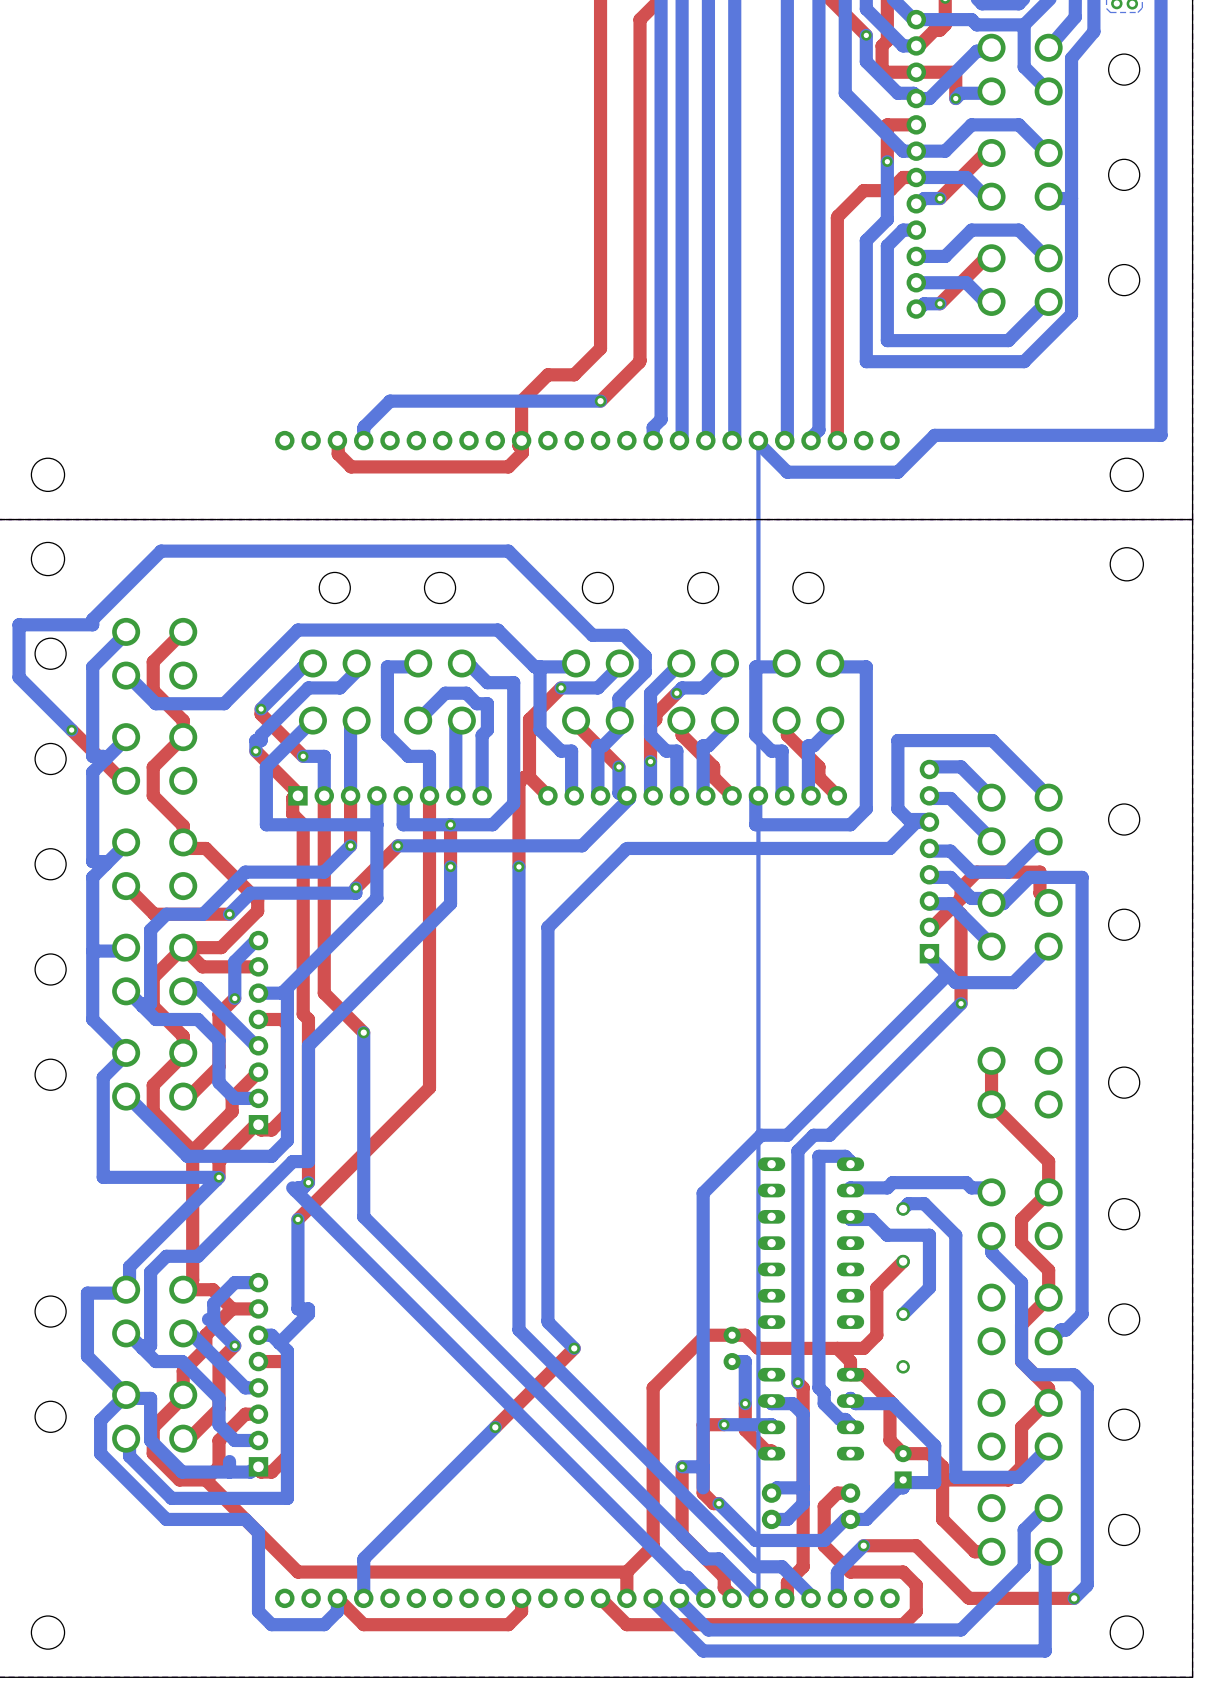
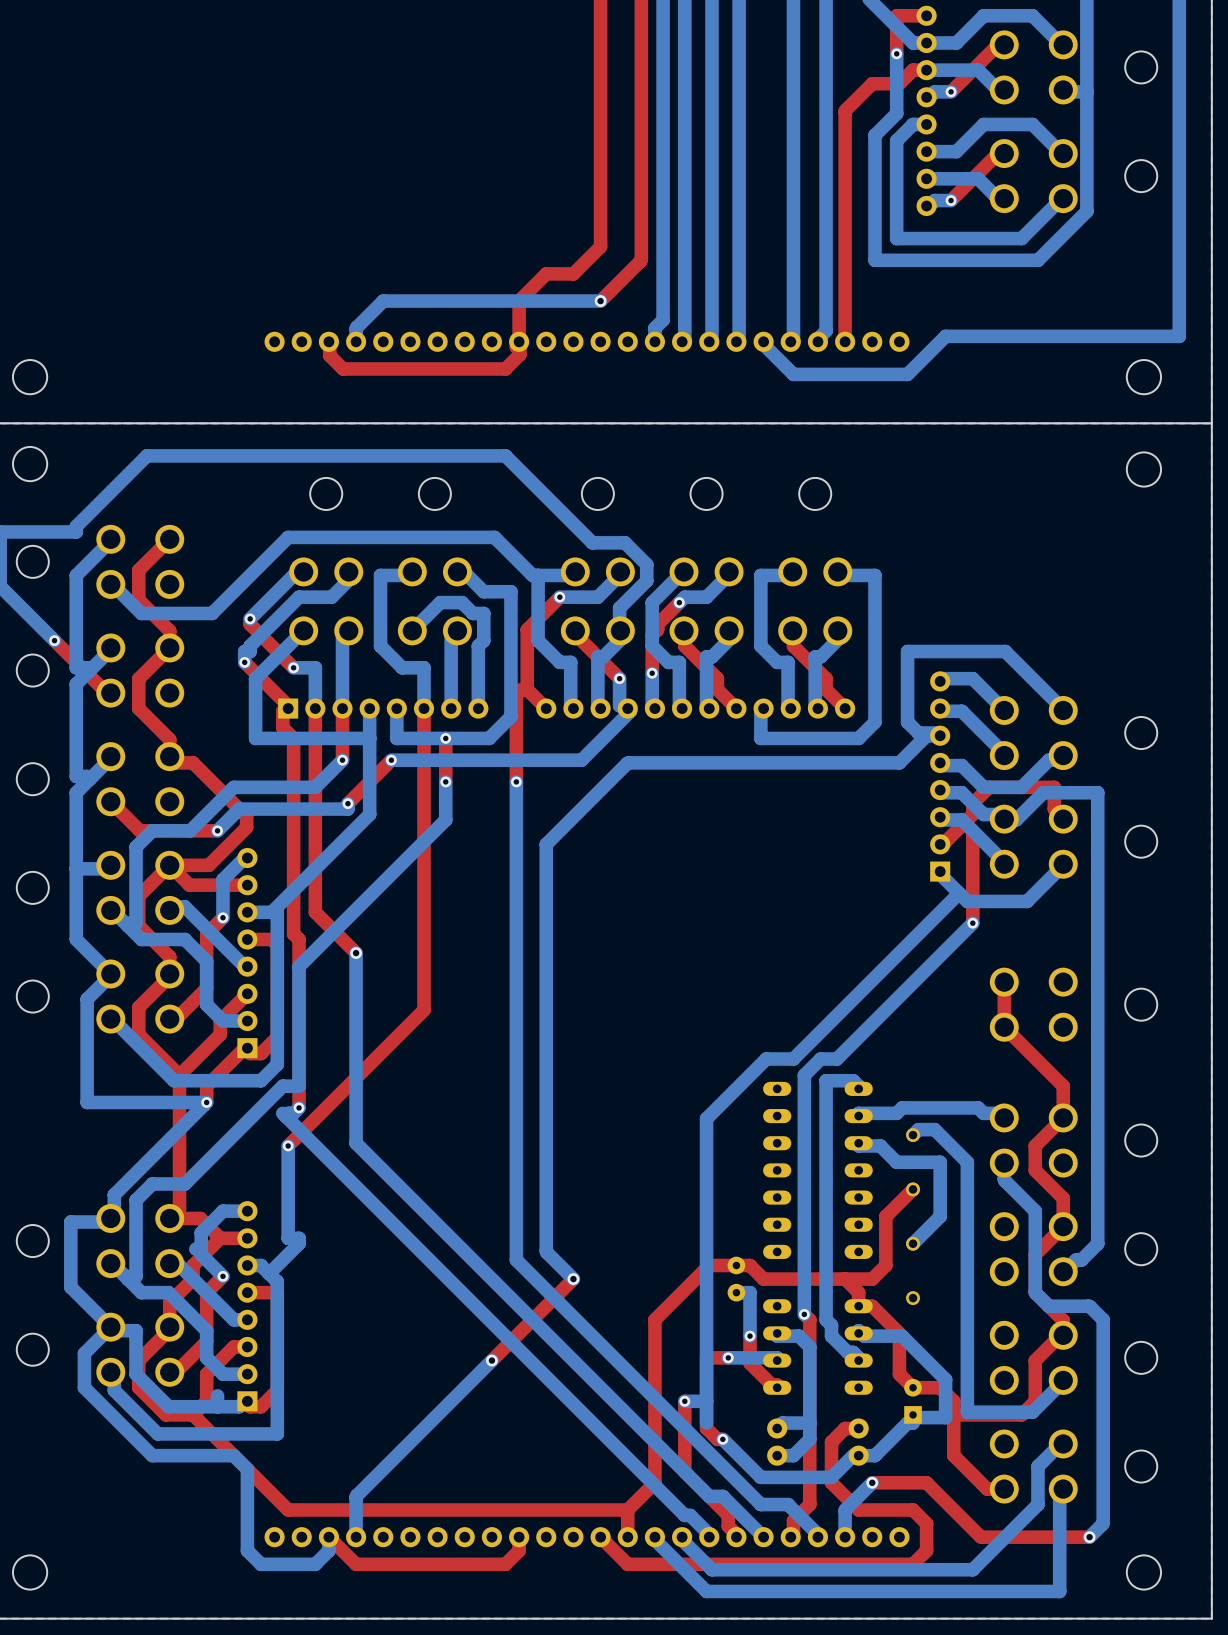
bottom track: (758, 440) (758, 1598) -> none

